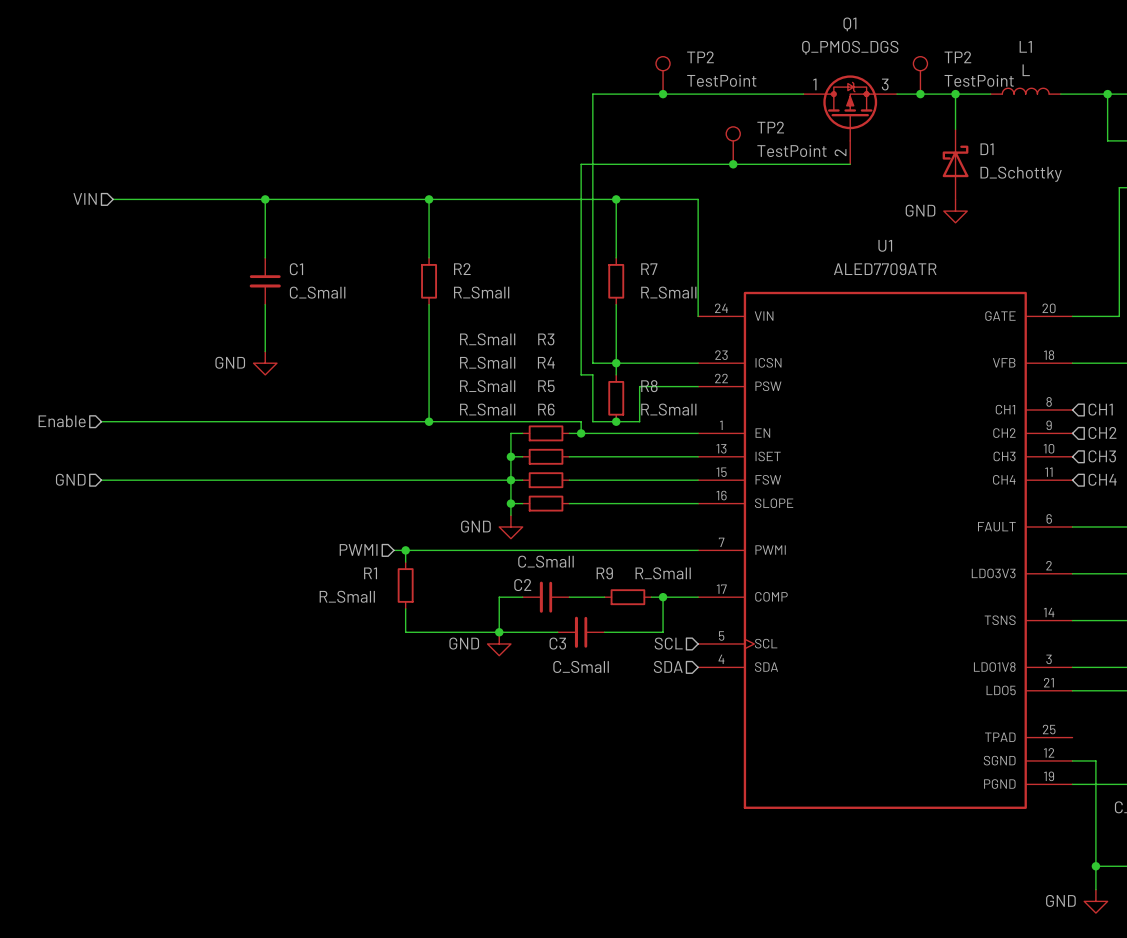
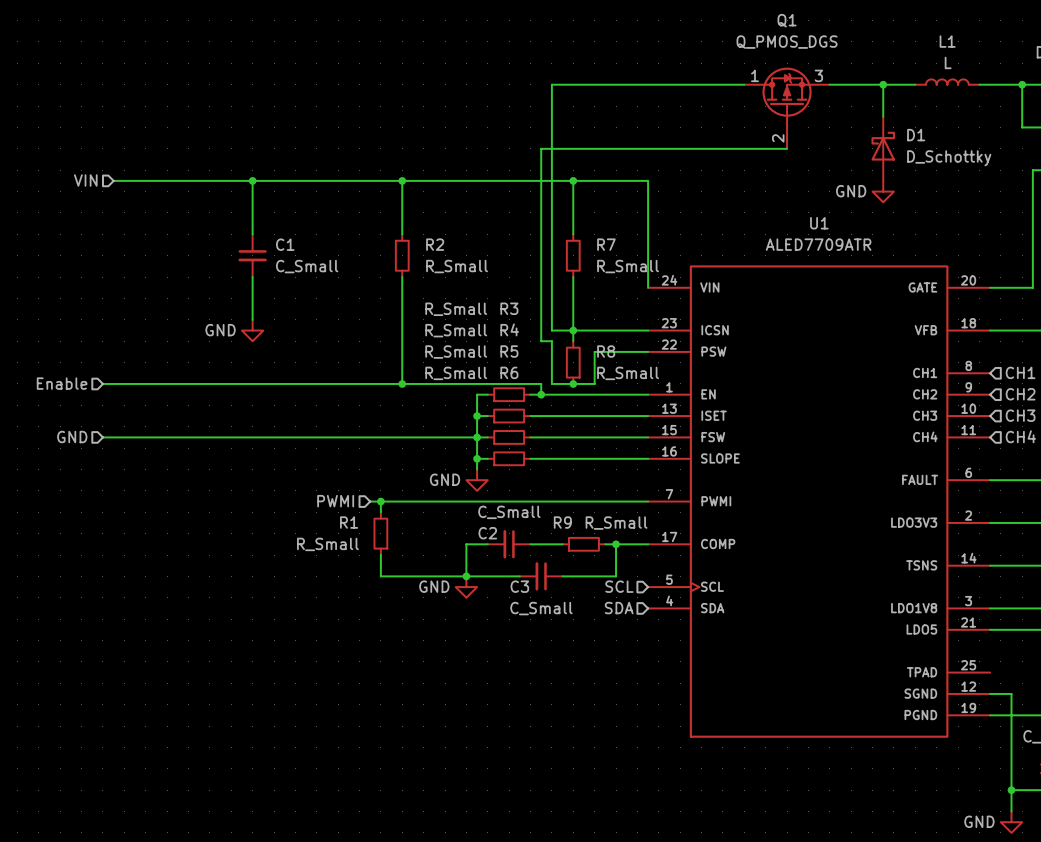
TP2: TestPoint (663, 75) -> none
TP2: TestPoint (920, 75) -> none
junction: (663, 94) -> none
junction: (920, 94) -> none
TP2: TestPoint (733, 145) -> none
junction: (733, 164) -> none

